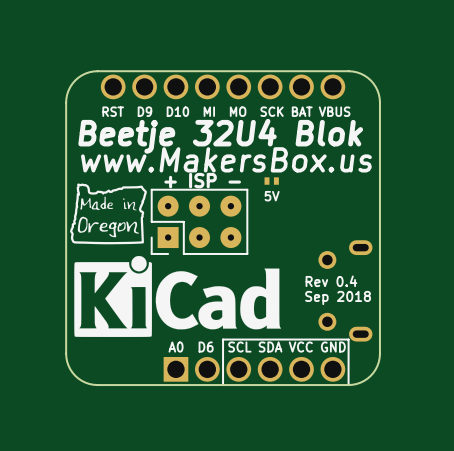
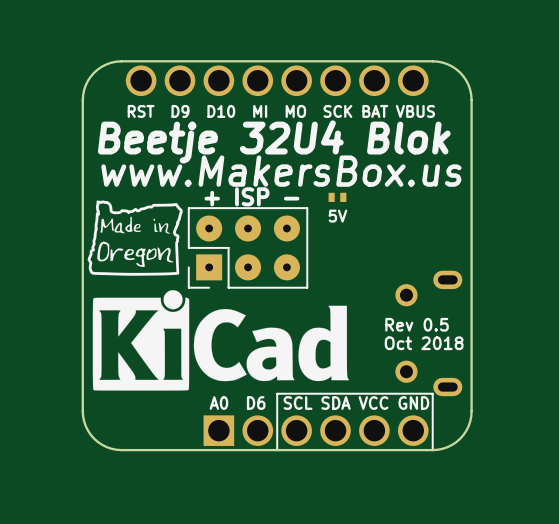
text: Rev 0.4 (331, 281) -> Rev 0.5 (417, 324)
text: Sep 2018 (338, 297) -> Oct 2018 (424, 343)

